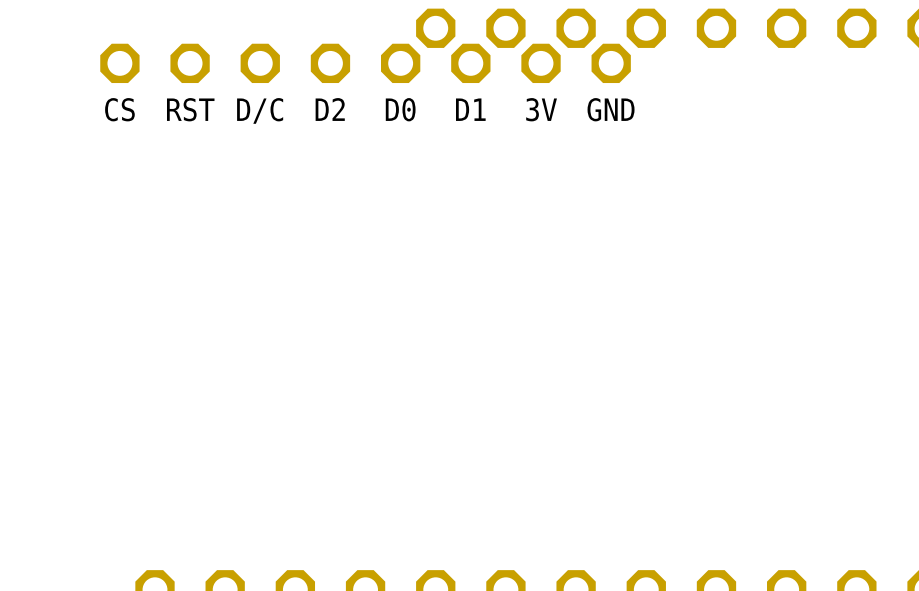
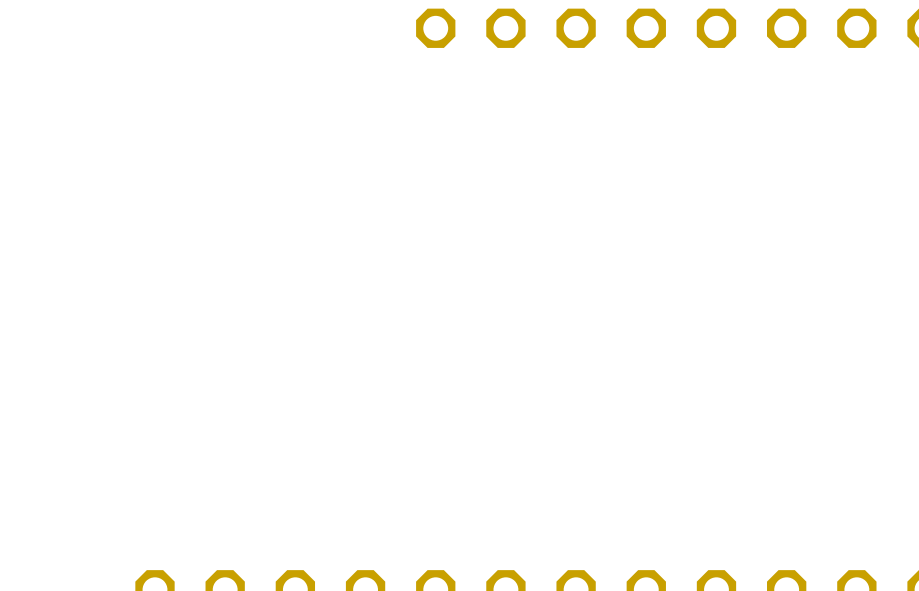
part: (365, 63) -> none

